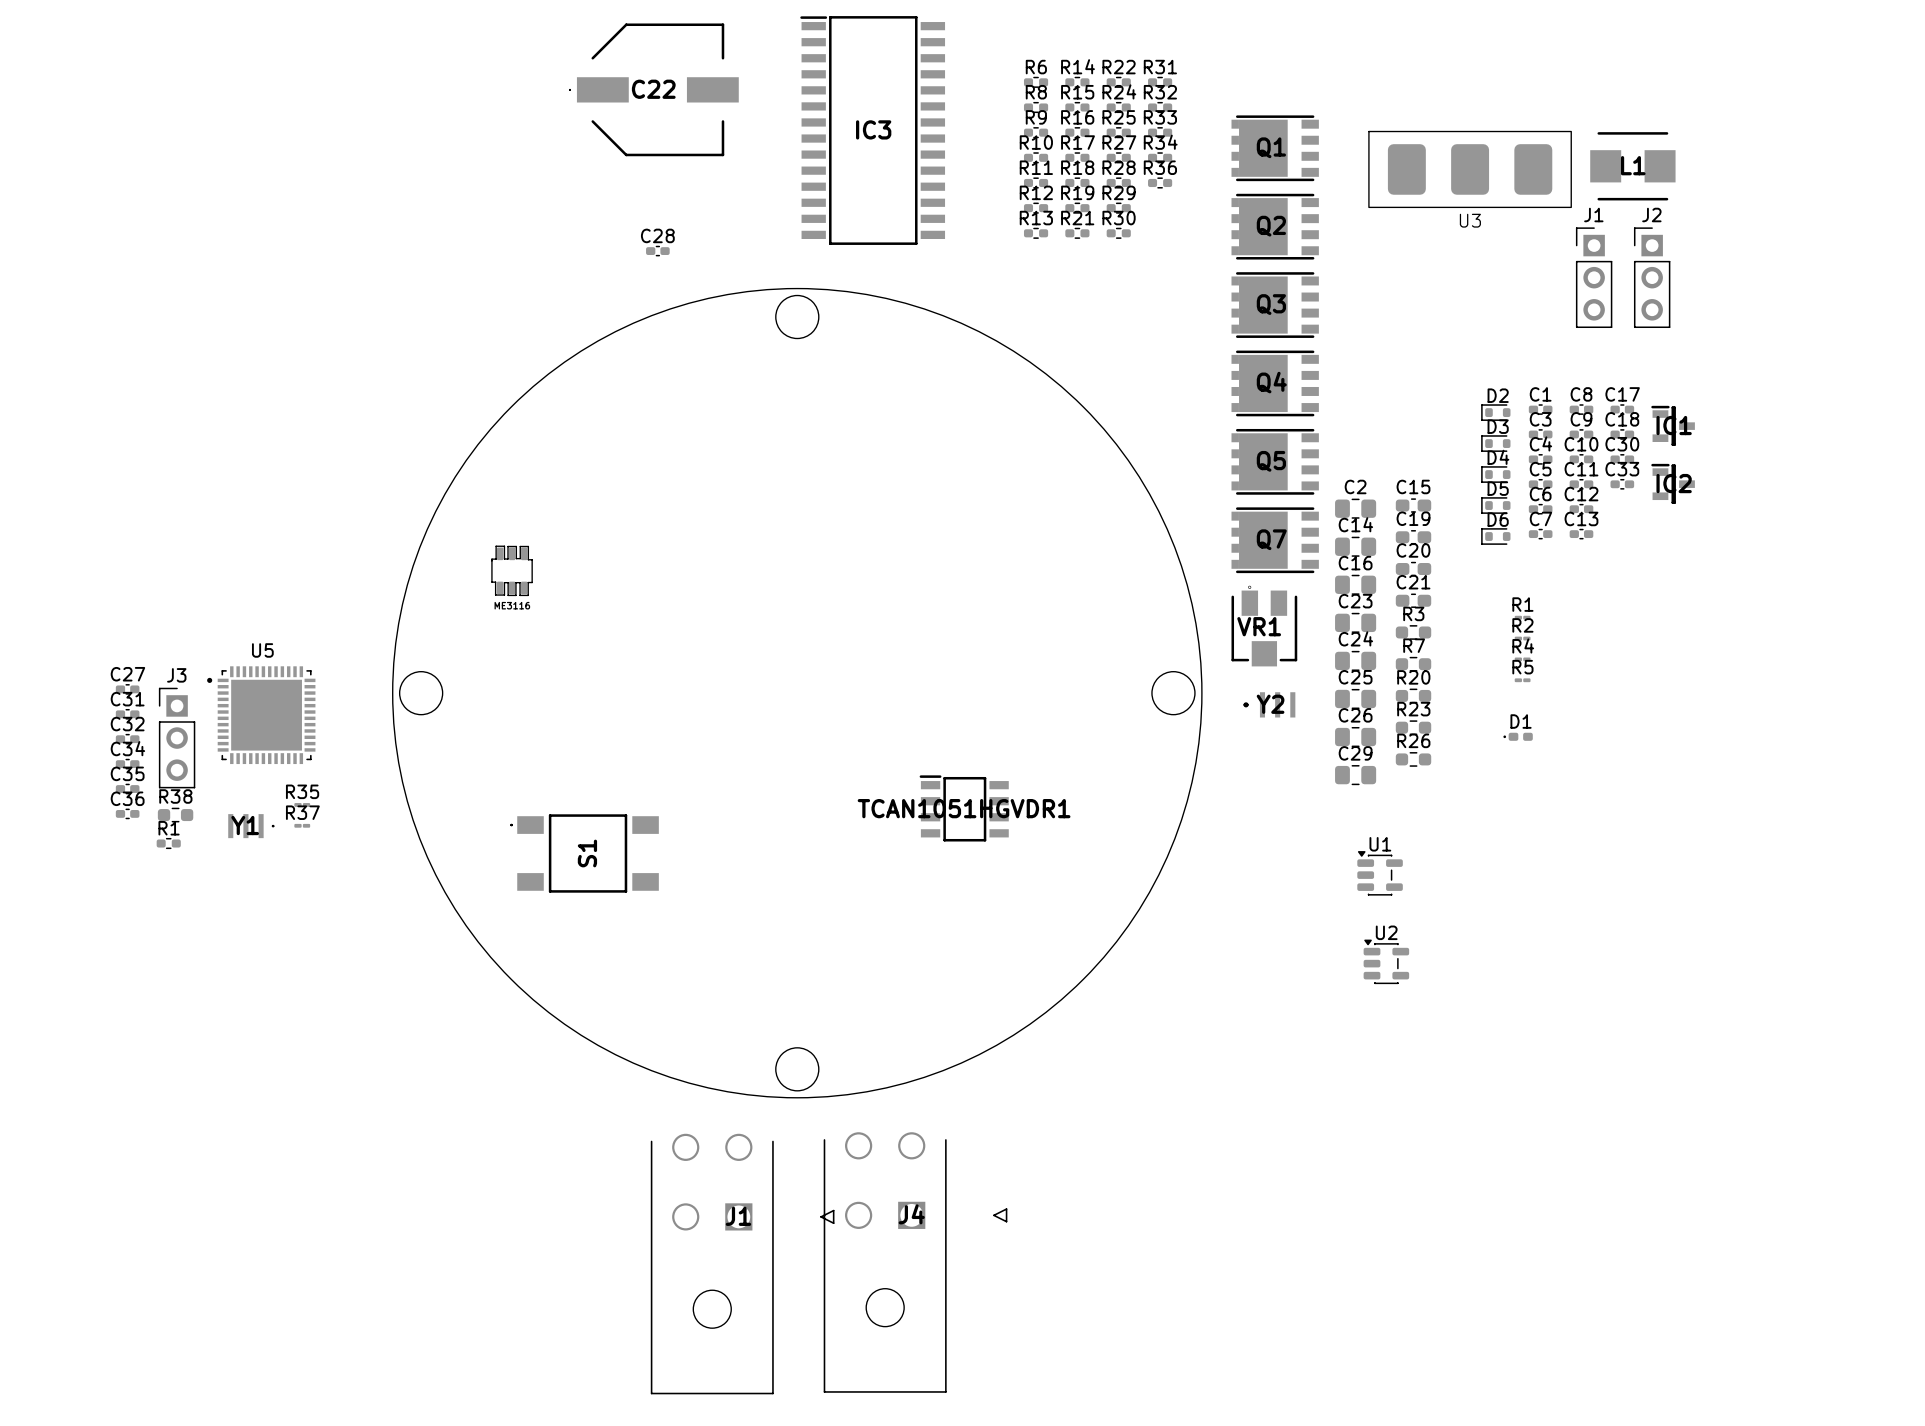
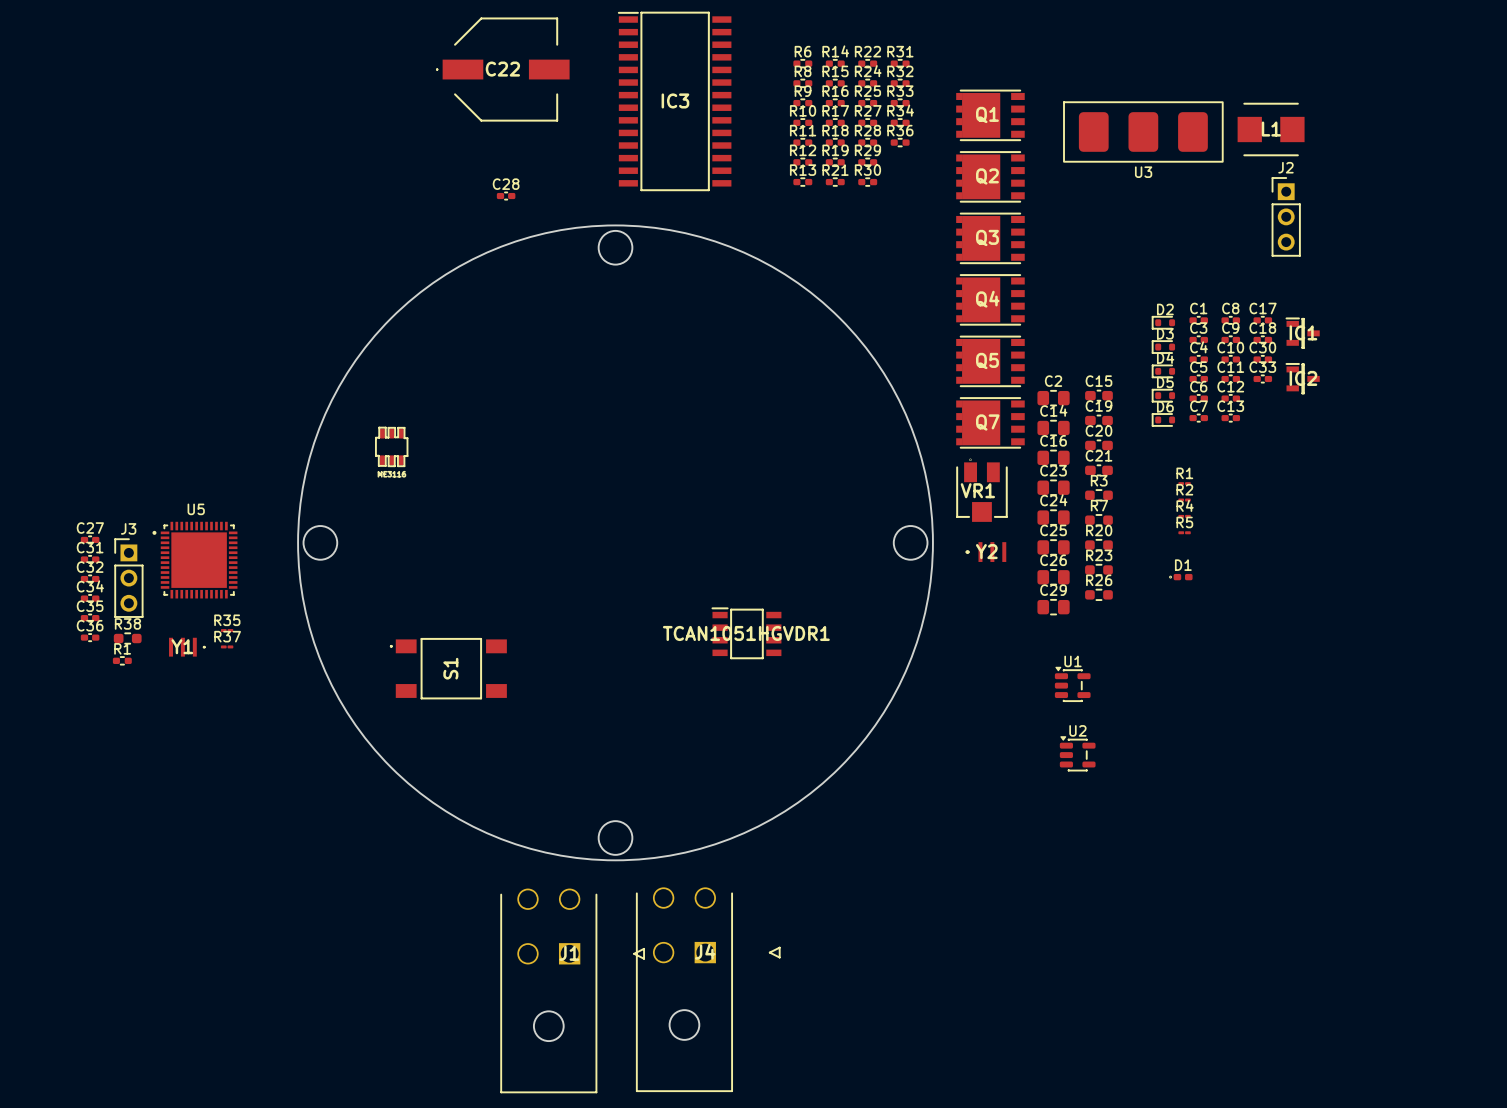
J1: (1594, 277) -> none

